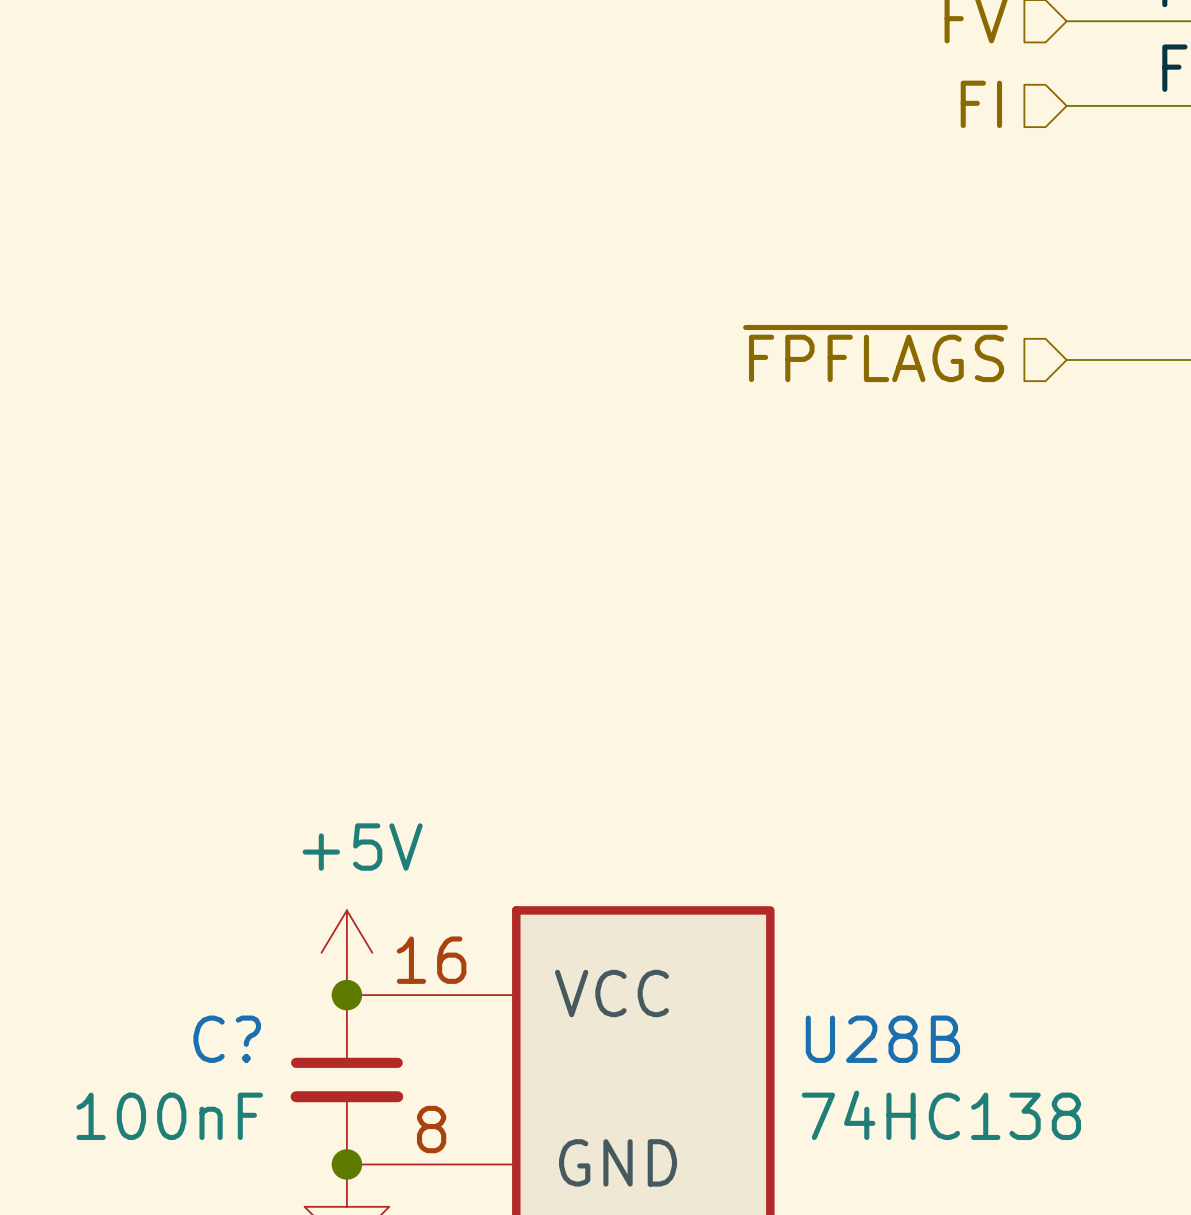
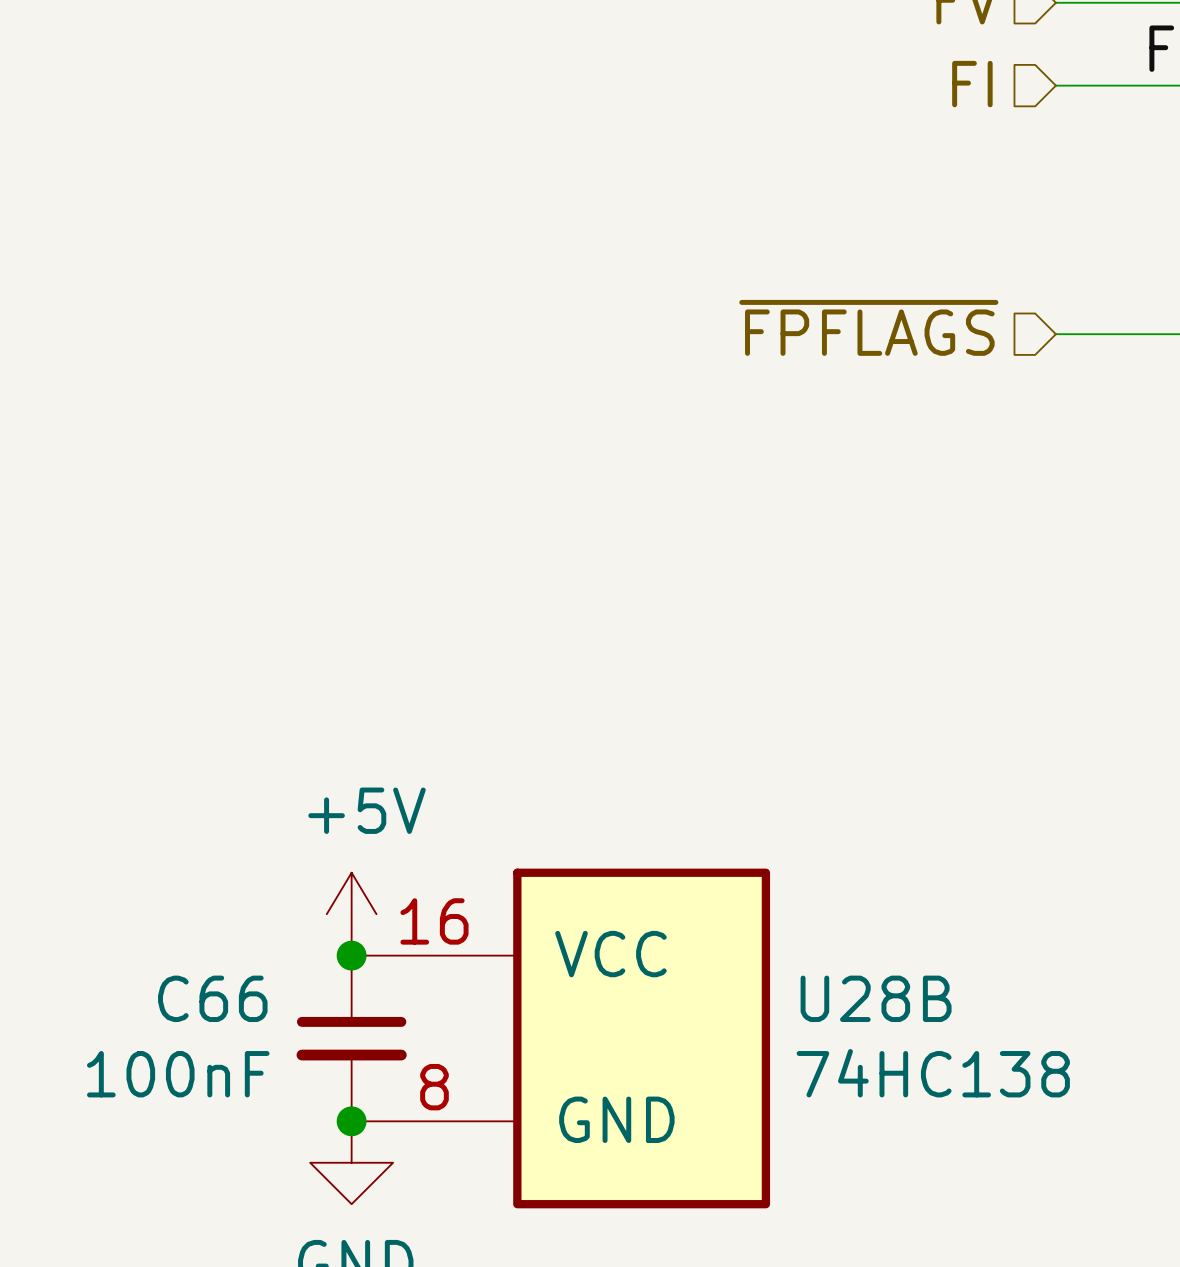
C? name: C? (227, 1039) -> C66 (212, 998)

